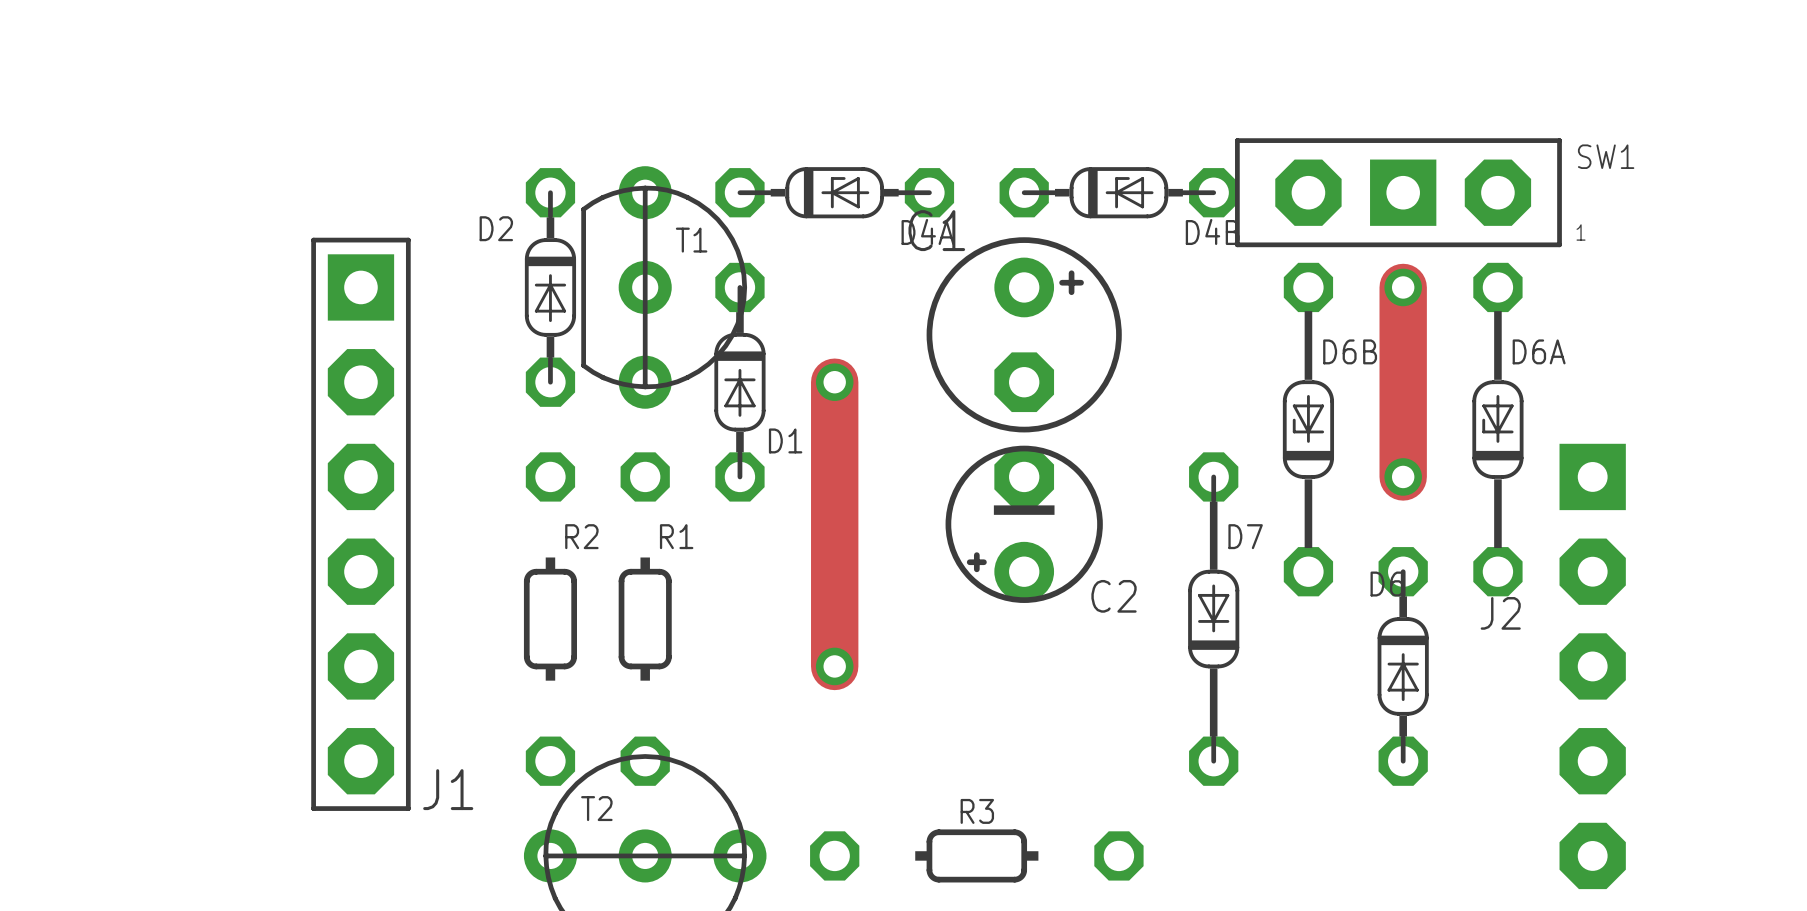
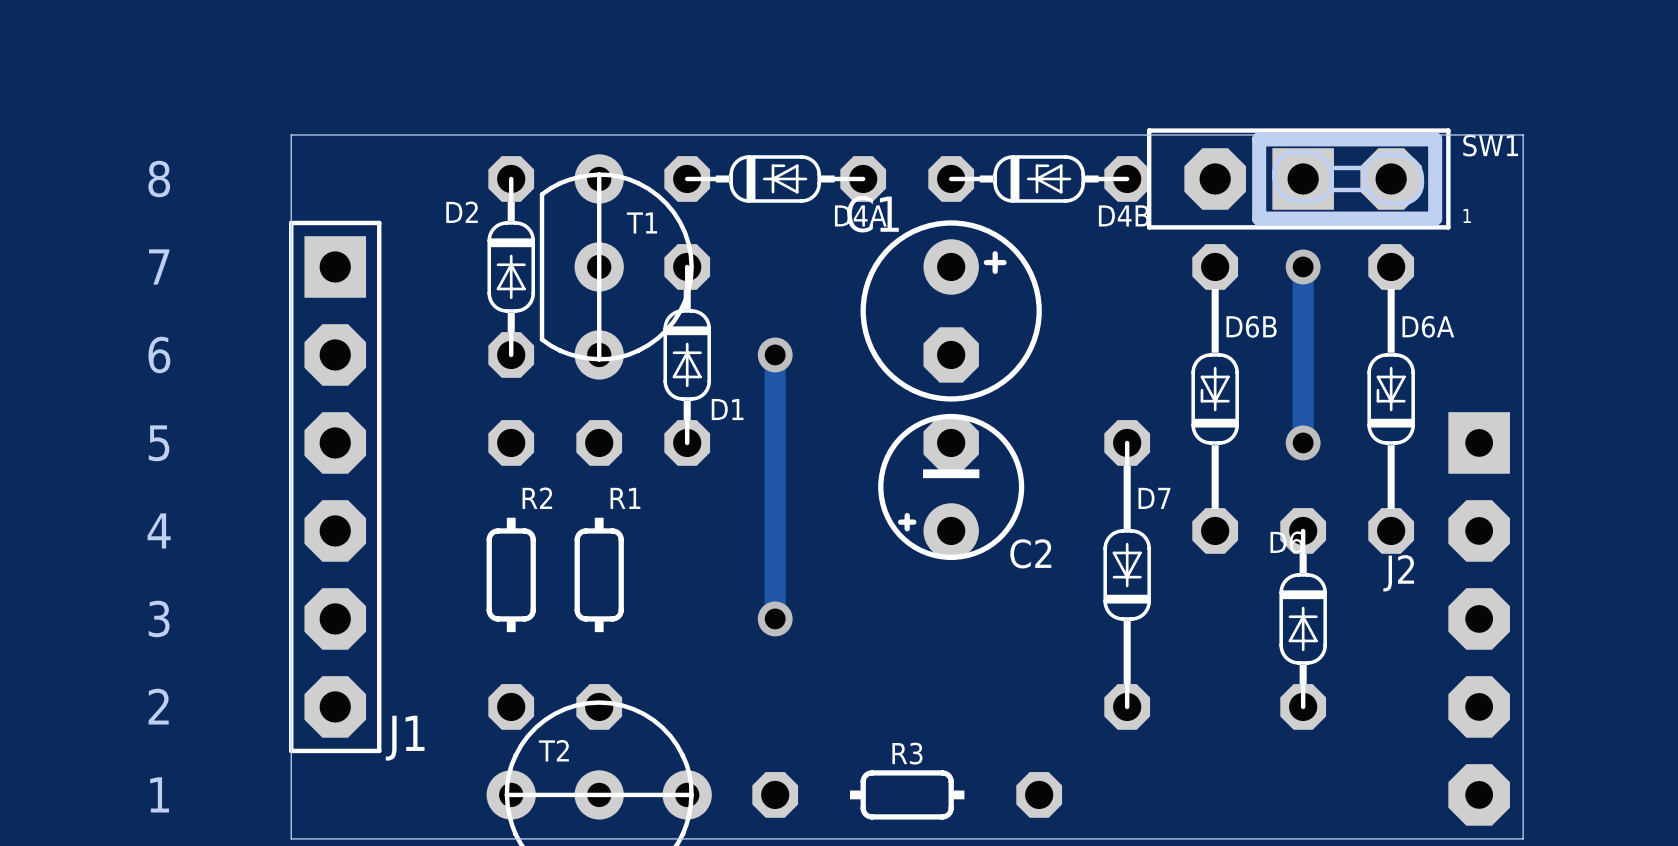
SW1 footprint: [1235, 138, 1562, 248] -> [1146, 128, 1451, 230]
board edge: none -> (291, 134) (1523, 134) (1523, 838) (291, 838) (291, 134)
text: none -> 8 (159, 179)
text: none -> 7 (159, 266)
track width: thick (1403, 287) (1403, 476) -> thin (1303, 266) (1303, 442)
text: none -> 6 (159, 354)
track width: thick (834, 382) (834, 666) -> thin (775, 354) (775, 618)
text: none -> 5 (159, 443)
text: none -> 4 (159, 530)
text: none -> 3 (159, 618)
text: none -> 2 (158, 706)
text: none -> 1 (159, 794)

